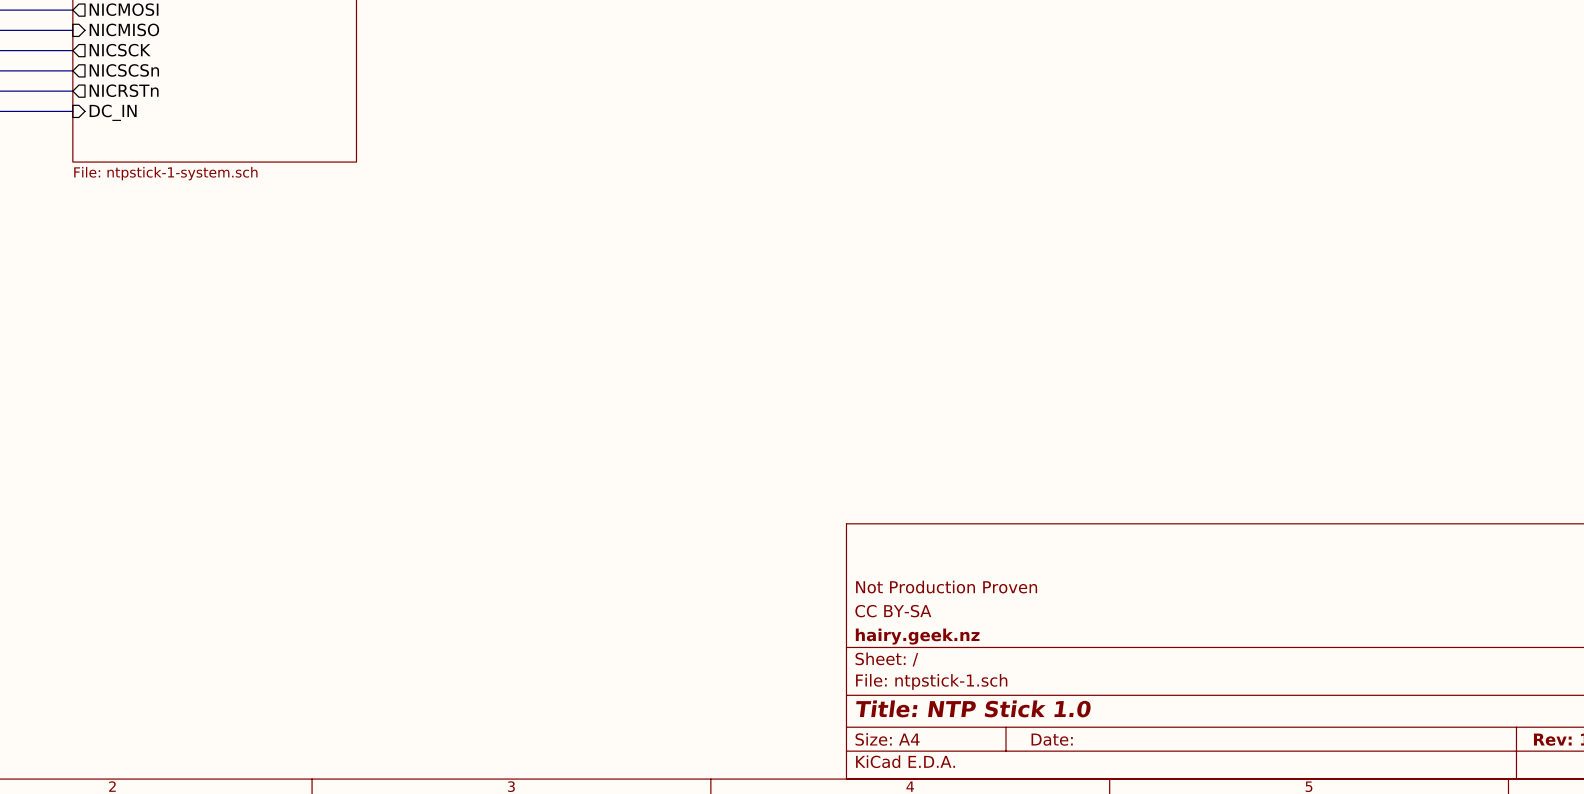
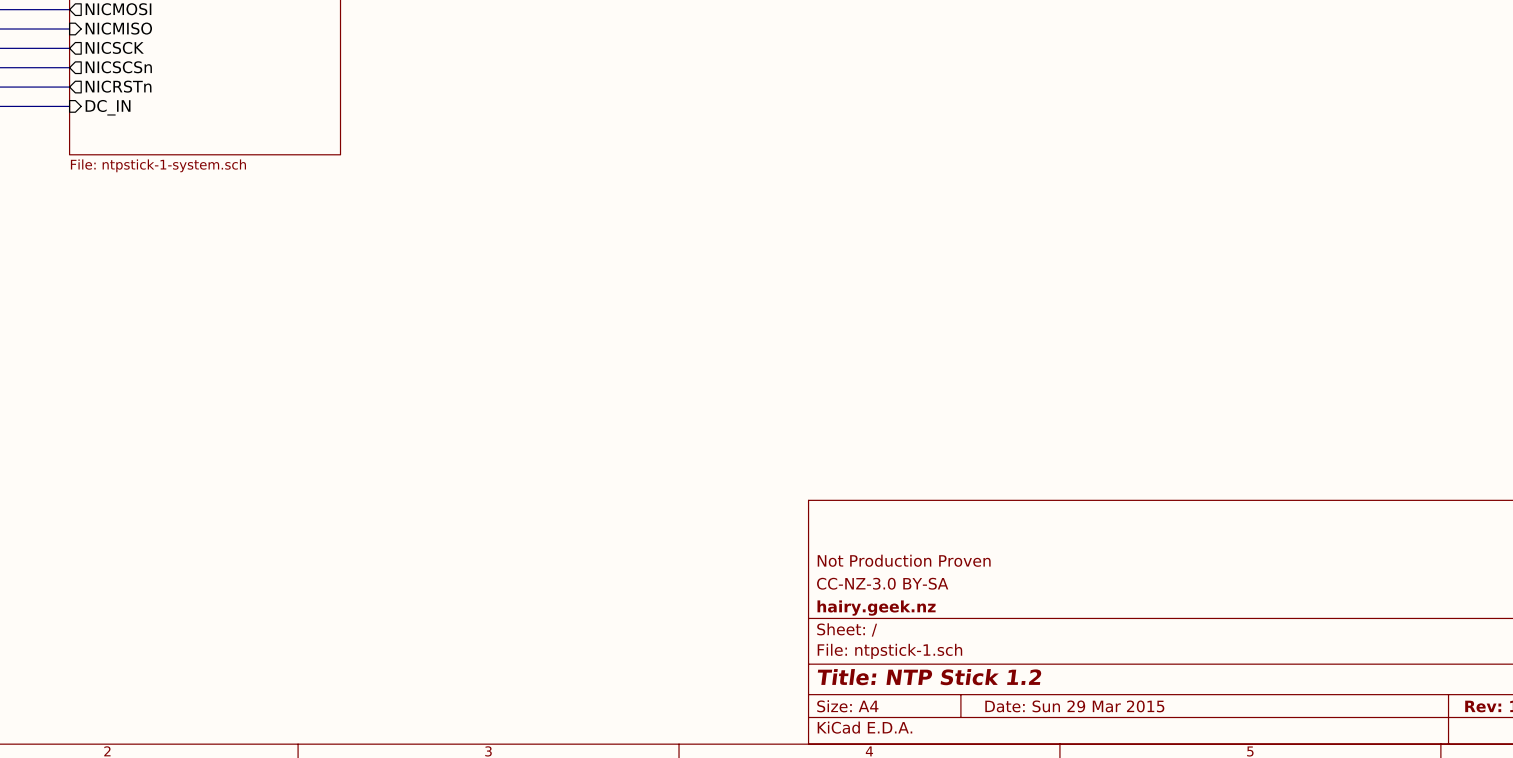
title block: CC BY-SA (893, 611) -> CC-NZ-3.0 BY-SA (882, 583)
title block: Title: NTP Stick 1.0 (973, 708) -> Title: NTP Stick 1.2 (929, 677)
title block: Date: (1052, 739) -> Date: Sun 29 Mar 2015 (1074, 706)

